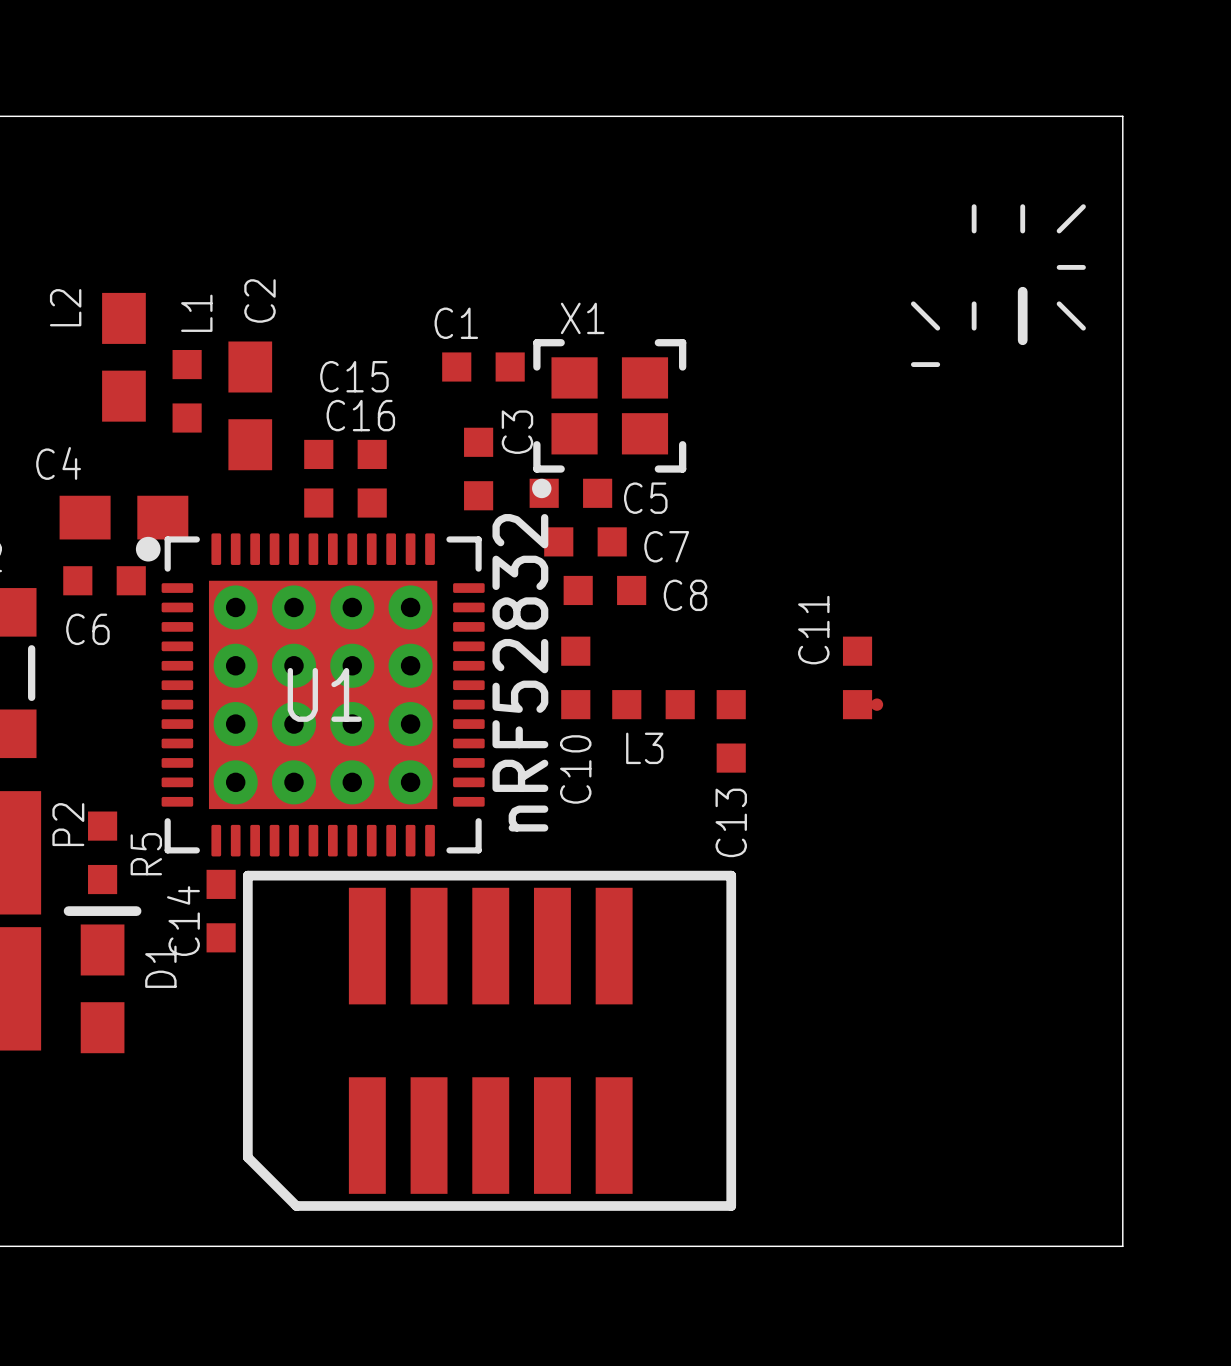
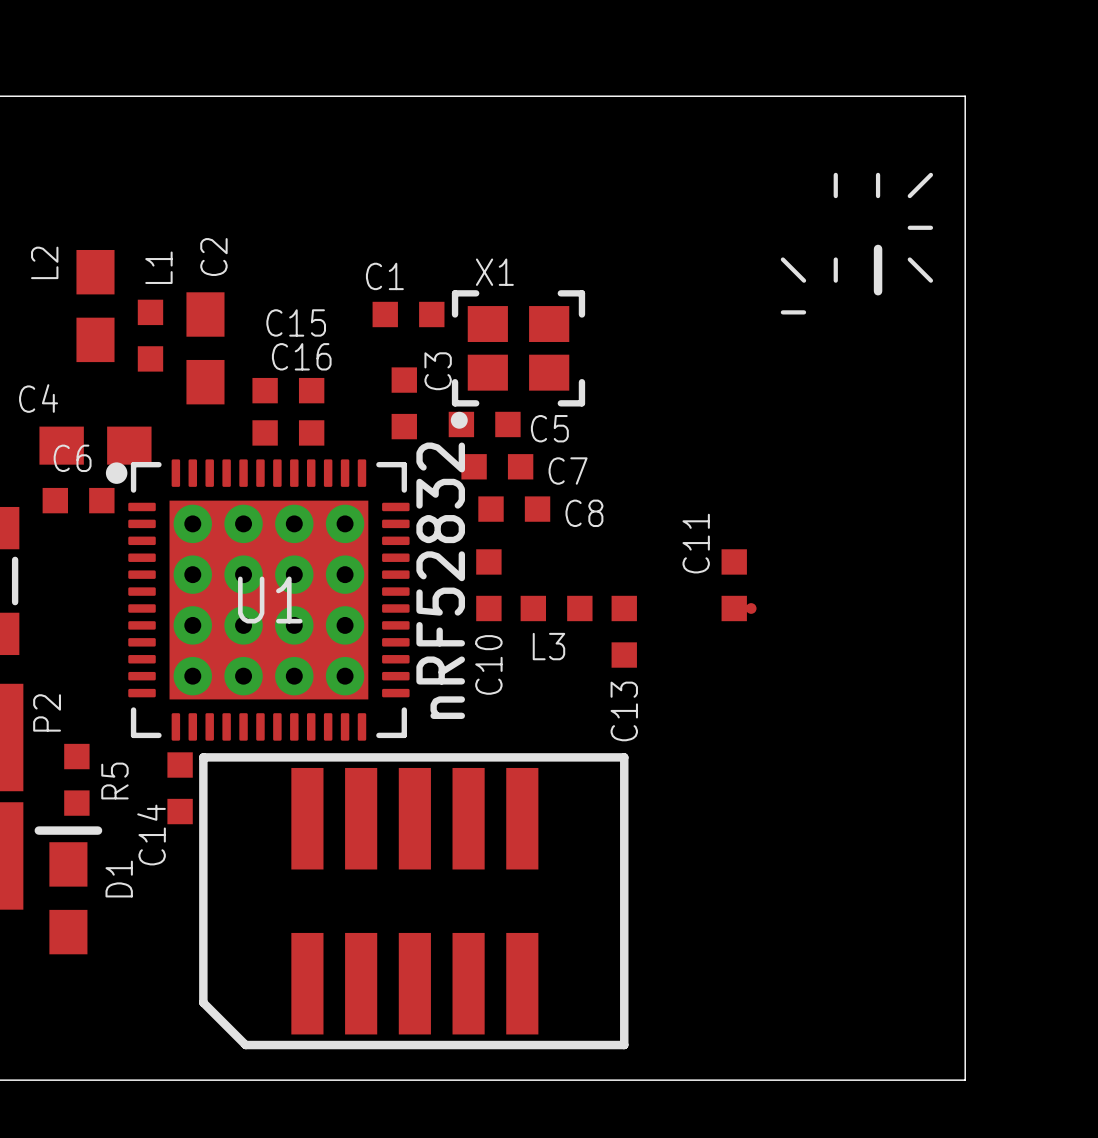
C6 name position: C6 (87, 629) -> C6 (72, 458)
R5 position: (102, 852) -> (76, 779)
C14 name position: C14 (183, 921) -> C14 (151, 835)
D1 position: (102, 979) -> (68, 890)

